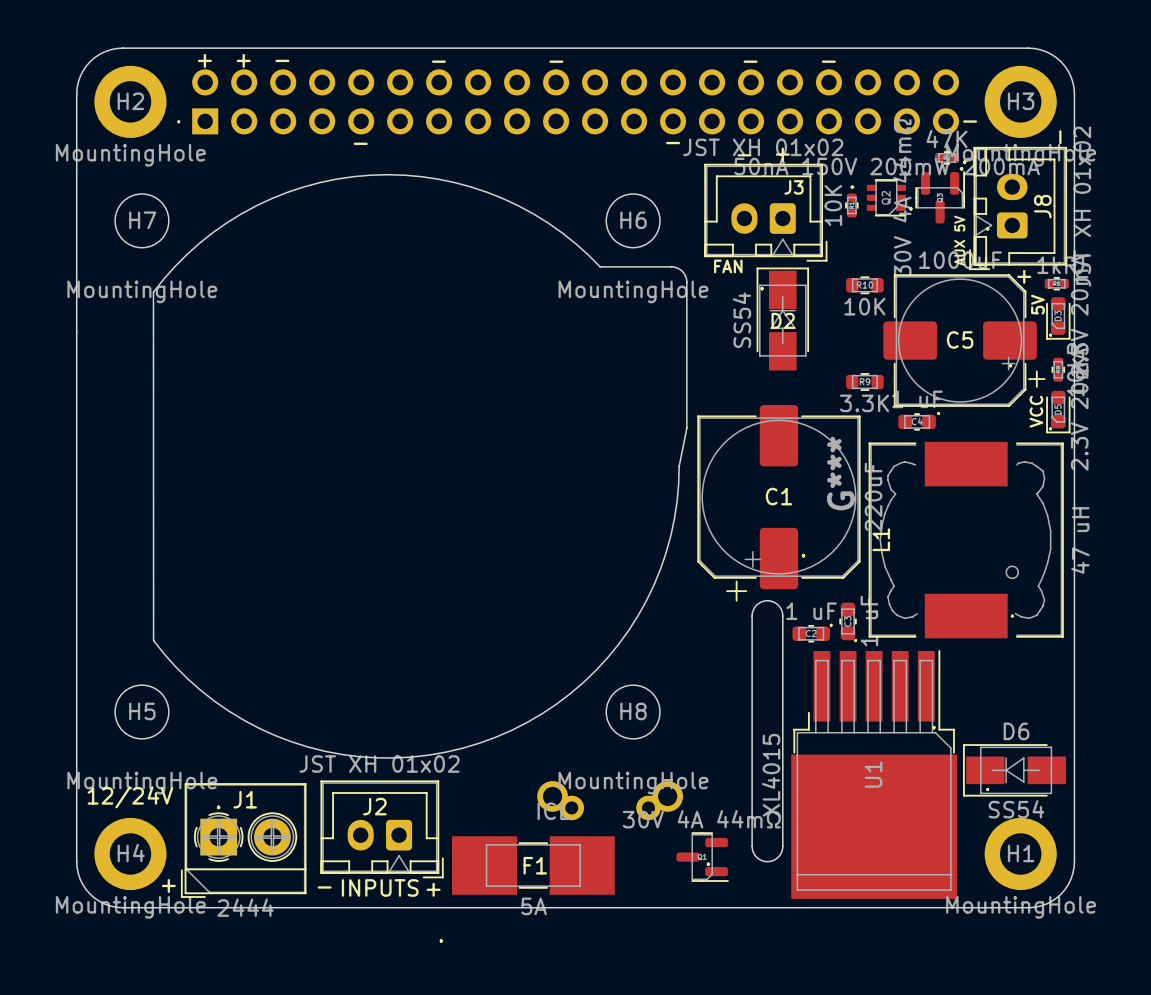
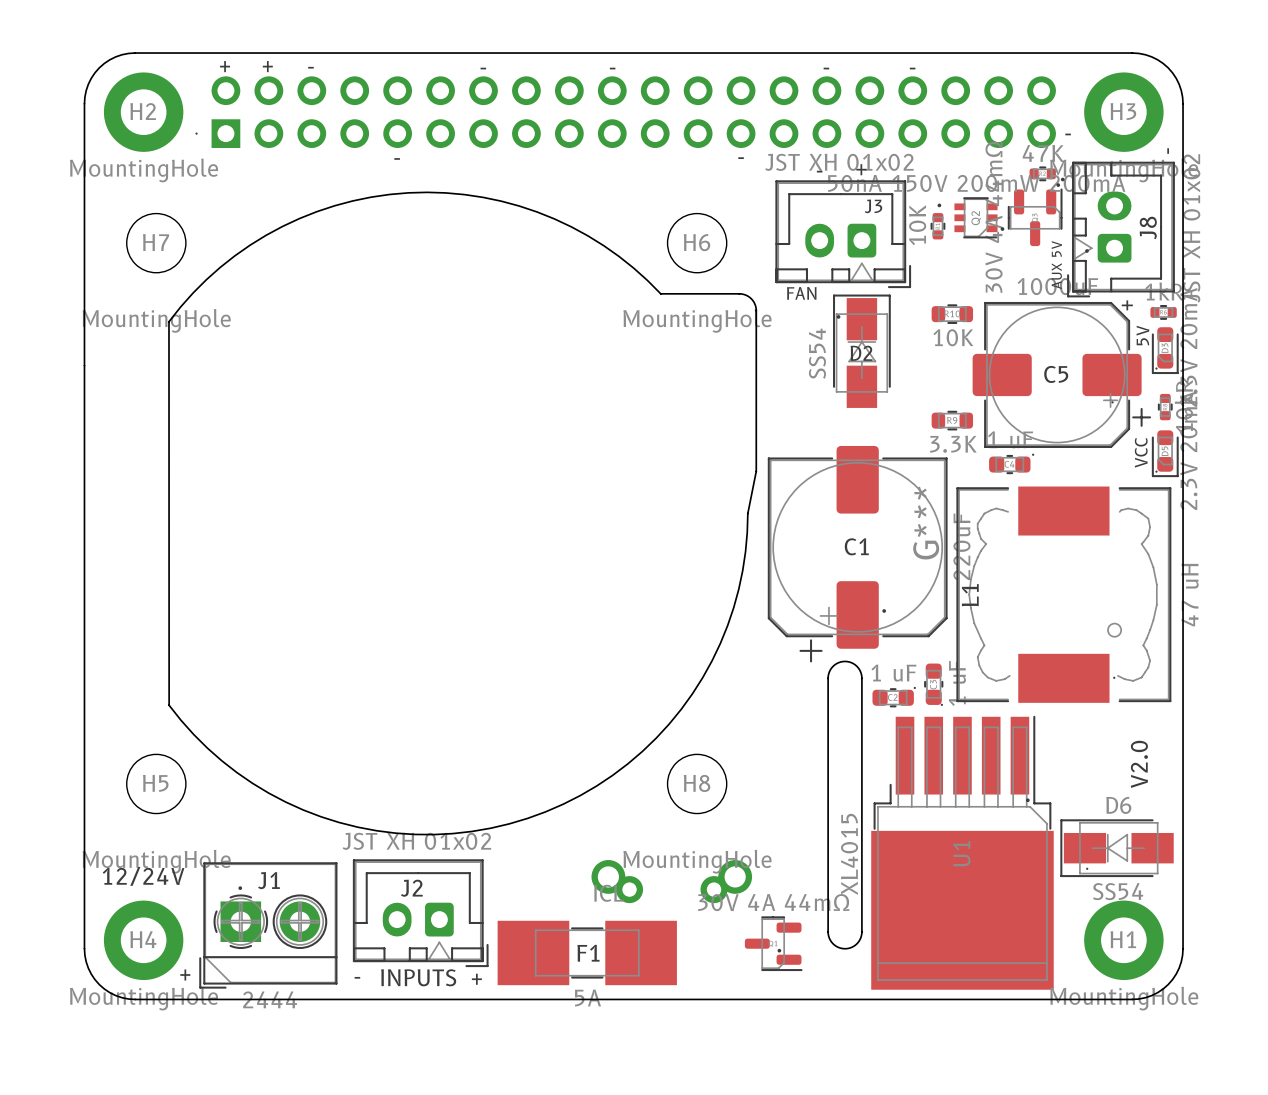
text: none -> V2.0 (1139, 764)
text: . (441, 940) -> none

